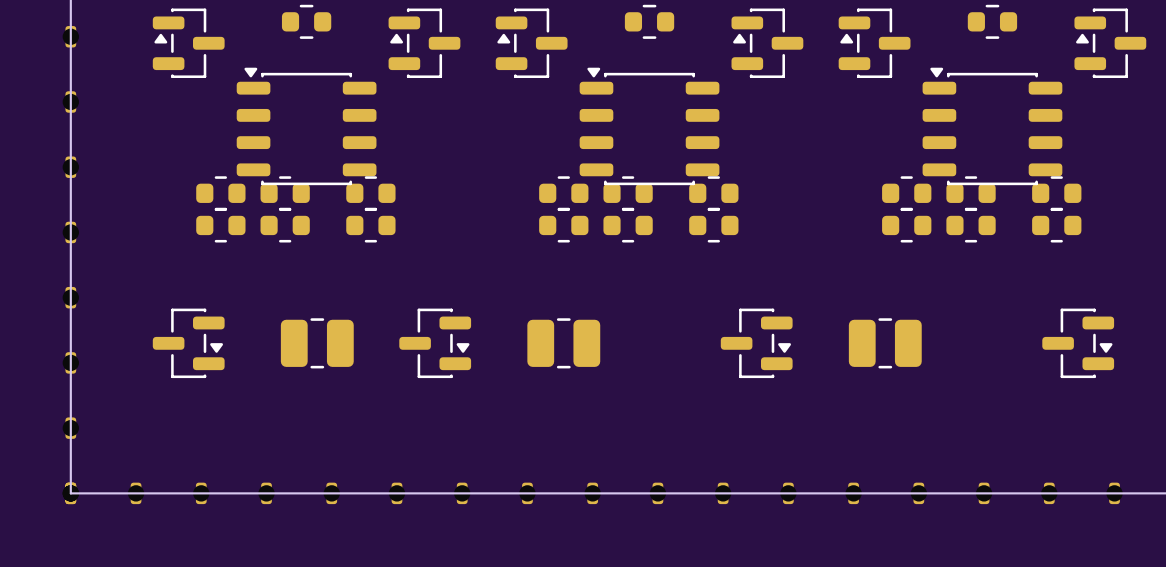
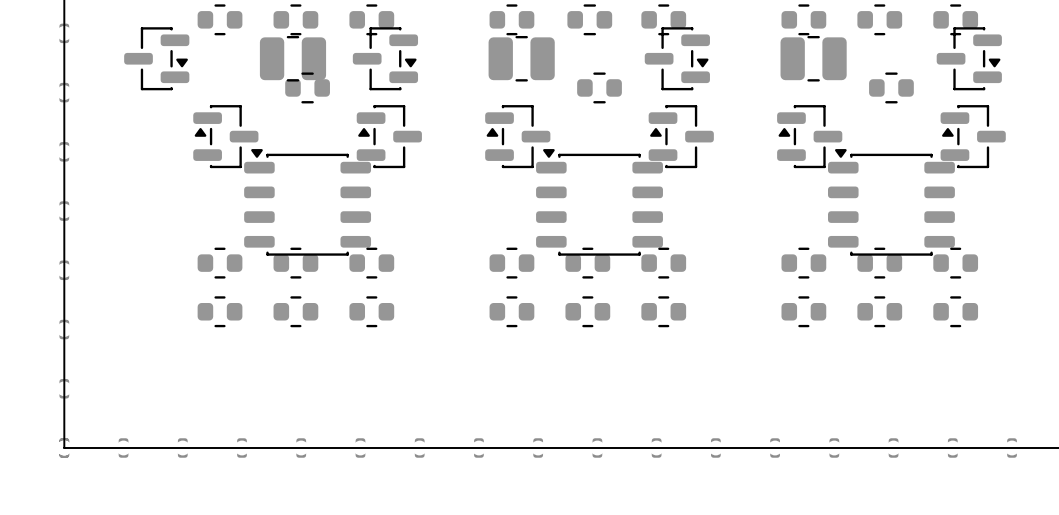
part footprint: [281, 4, 332, 39] -> [273, 4, 319, 36]
part: none -> (220, 19)
part: none -> (371, 19)
part: none -> (511, 19)
part: none -> (663, 19)
part: none -> (803, 19)
part: none -> (879, 19)
part position: (992, 21) -> (891, 87)
part: none -> (955, 19)
part rotation: 0° (188, 43) -> 180° (156, 58)
part rotation: 0° (424, 43) -> 180° (385, 58)
part: (531, 43) -> none
part rotation: 0° (767, 43) -> 180° (677, 58)
part: (874, 43) -> none
part rotation: 0° (1110, 43) -> 180° (969, 58)
part position: (1110, 43) -> (969, 58)
part: none -> (292, 58)
part: none -> (521, 58)
part: none -> (813, 58)
part: none -> (307, 87)
part: none -> (599, 87)
part position: (306, 126) -> (307, 202)
part position: (649, 126) -> (599, 202)
part: (992, 126) -> none
part: none -> (225, 136)
part: none -> (389, 136)
part: none -> (517, 136)
part: none -> (681, 136)
part: none -> (809, 136)
part: none -> (973, 136)
part: (220, 193) -> none
part: (285, 193) -> none
part: (370, 193) -> none
part: (563, 193) -> none
part: (628, 193) -> none
part: (713, 193) -> none
part: (906, 193) -> none
part: (971, 193) -> none
part: (1056, 193) -> none
part footprint: [946, 208, 996, 243] -> [828, 149, 955, 256]
part: (220, 225) -> none
part: (285, 225) -> none
part: (370, 225) -> none
part: (563, 225) -> none
part: (628, 225) -> none
part: (713, 225) -> none
part: (906, 225) -> none
part: (1056, 225) -> none
part: none -> (220, 263)
part: none -> (295, 263)
part: none -> (371, 263)
part: none -> (511, 263)
part: none -> (587, 263)
part: none -> (663, 263)
part: none -> (803, 263)
part: none -> (879, 263)
part: none -> (955, 263)
part footprint: [280, 318, 354, 369] -> [273, 296, 319, 328]
part footprint: [527, 318, 601, 369] -> [489, 296, 535, 328]
part footprint: [848, 318, 922, 369] -> [781, 296, 827, 328]
part: (188, 343) -> none
part: none -> (220, 311)
part: none -> (371, 311)
part: (435, 343) -> none
part: none -> (587, 311)
part: none -> (663, 311)
part: (756, 343) -> none
part: none -> (879, 311)
part: none -> (955, 311)
part: (1078, 343) -> none

